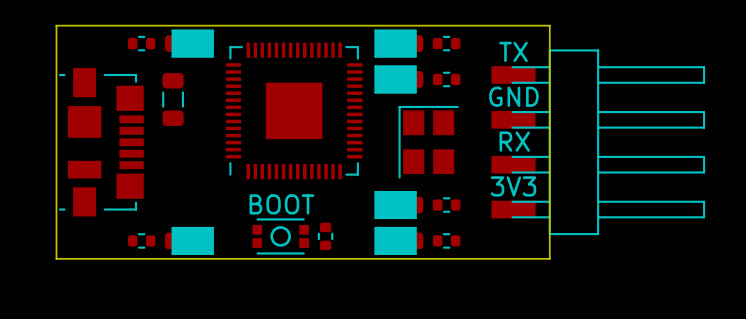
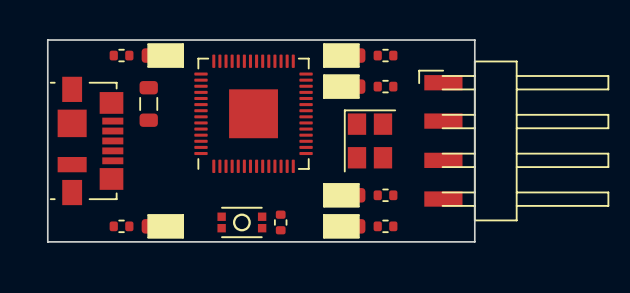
part footprint: [491, 49, 706, 236] -> [418, 60, 610, 222]
text: TX (513, 51) -> none
text: GND (513, 96) -> none
text: RX (514, 141) -> none
text: 3V3 (513, 186) -> none
text: BOOT (281, 204) -> none

